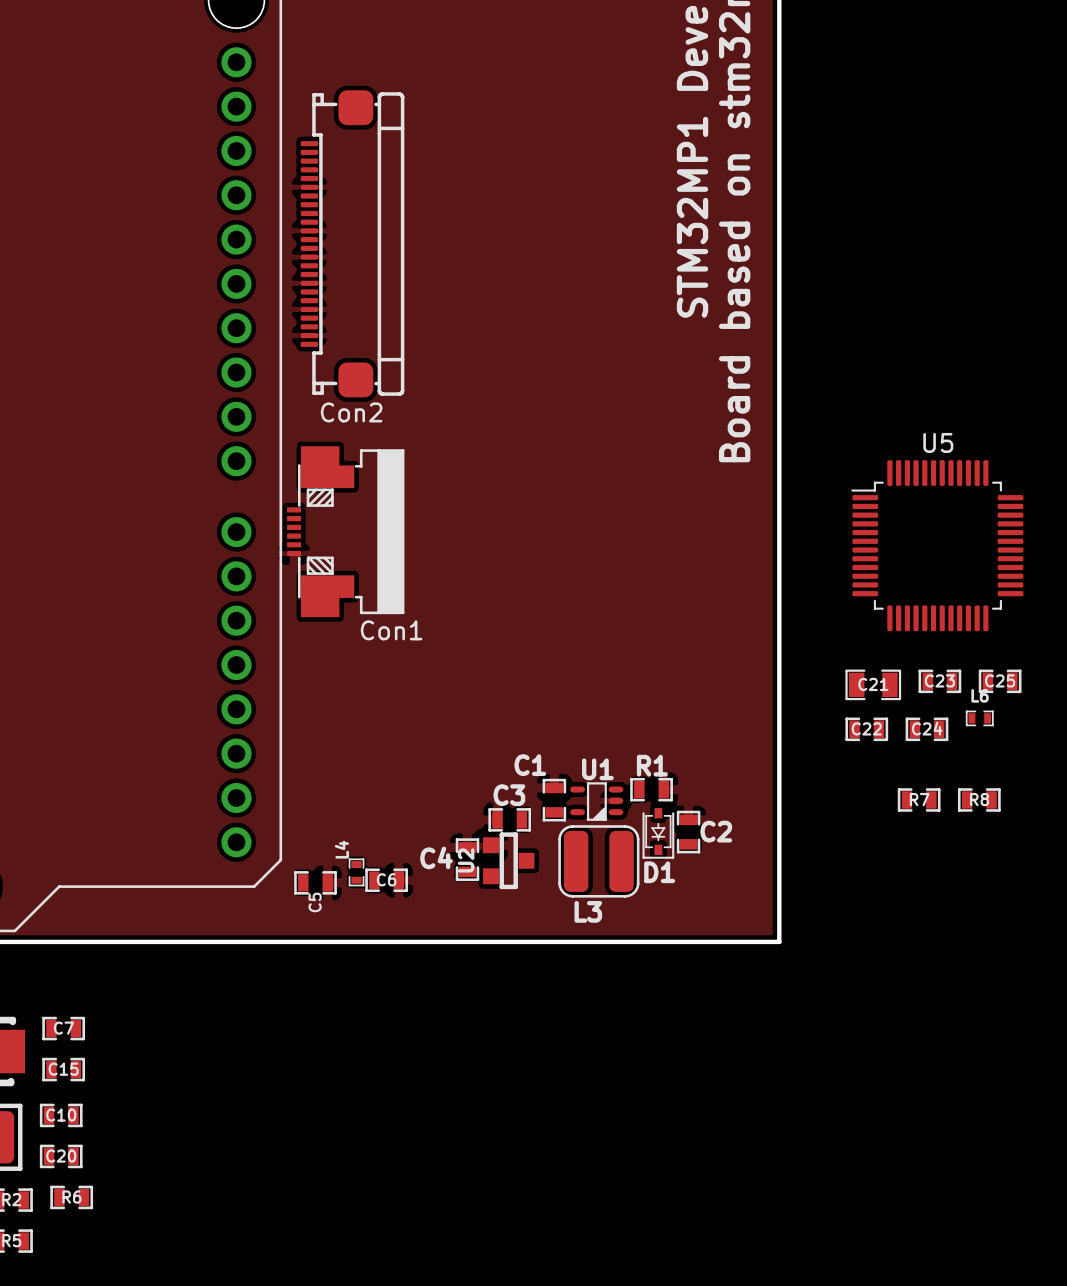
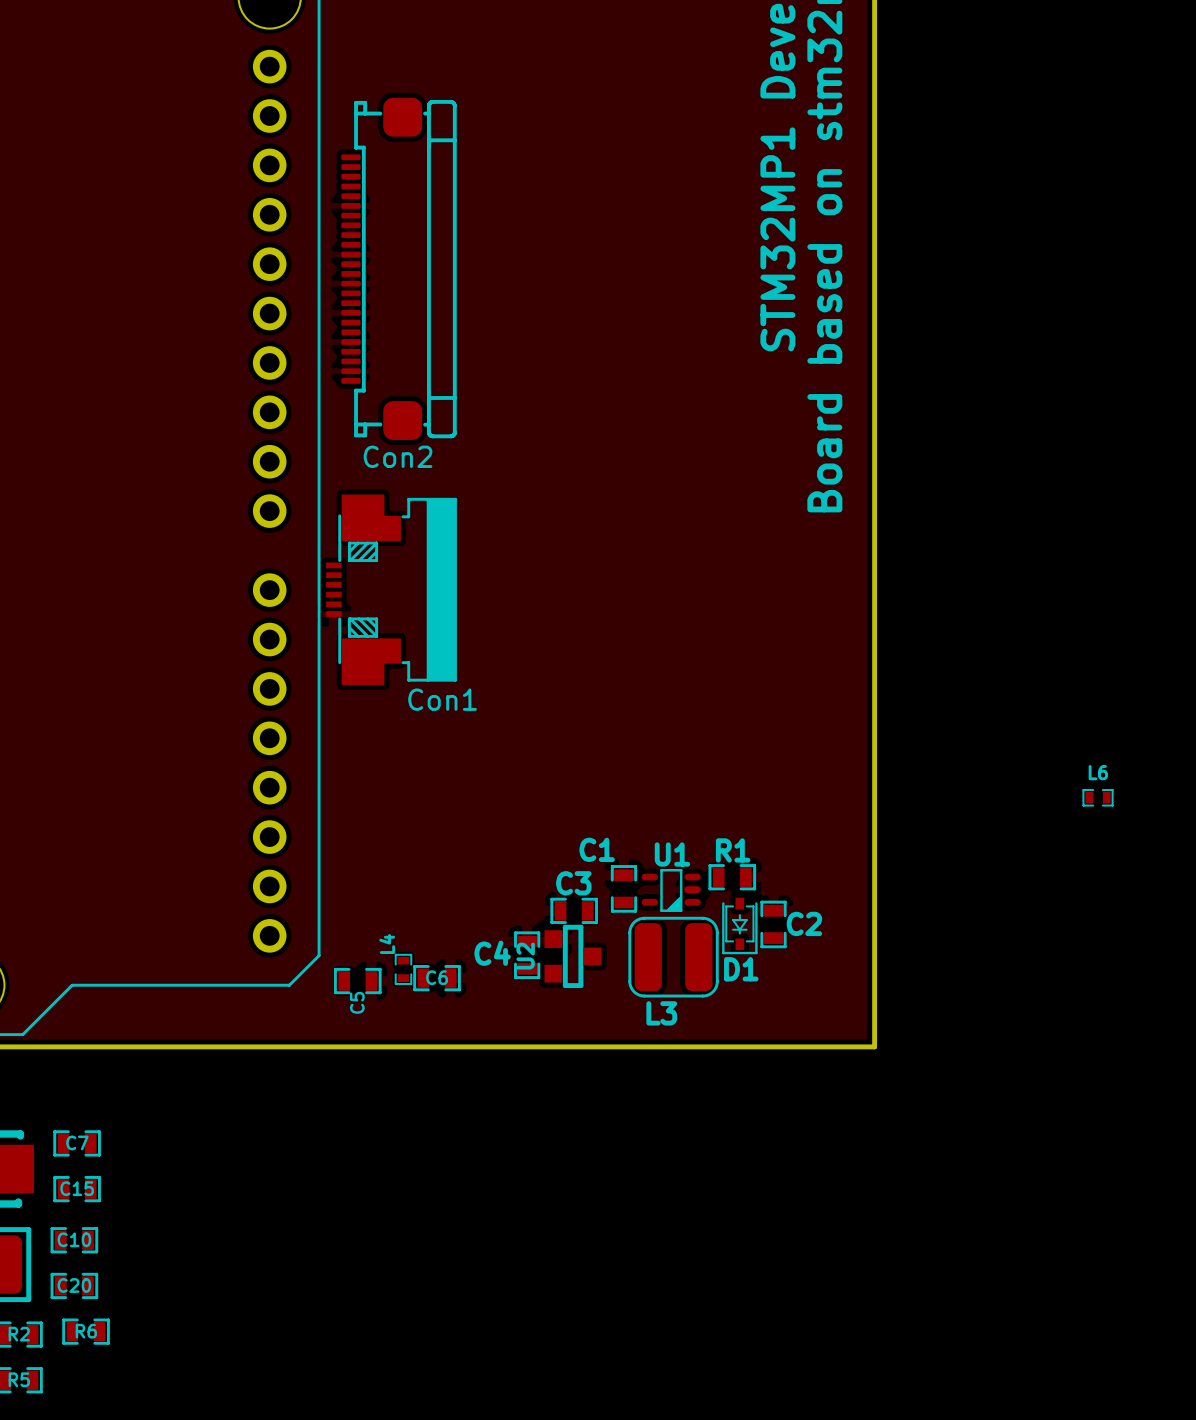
U5: (937, 545) -> none
C23: (939, 681) -> none
C25: (1000, 681) -> none
C21: (873, 684) -> none
C22: (866, 729) -> none
C24: (926, 729) -> none
R7: (919, 799) -> none
R8: (979, 799) -> none

